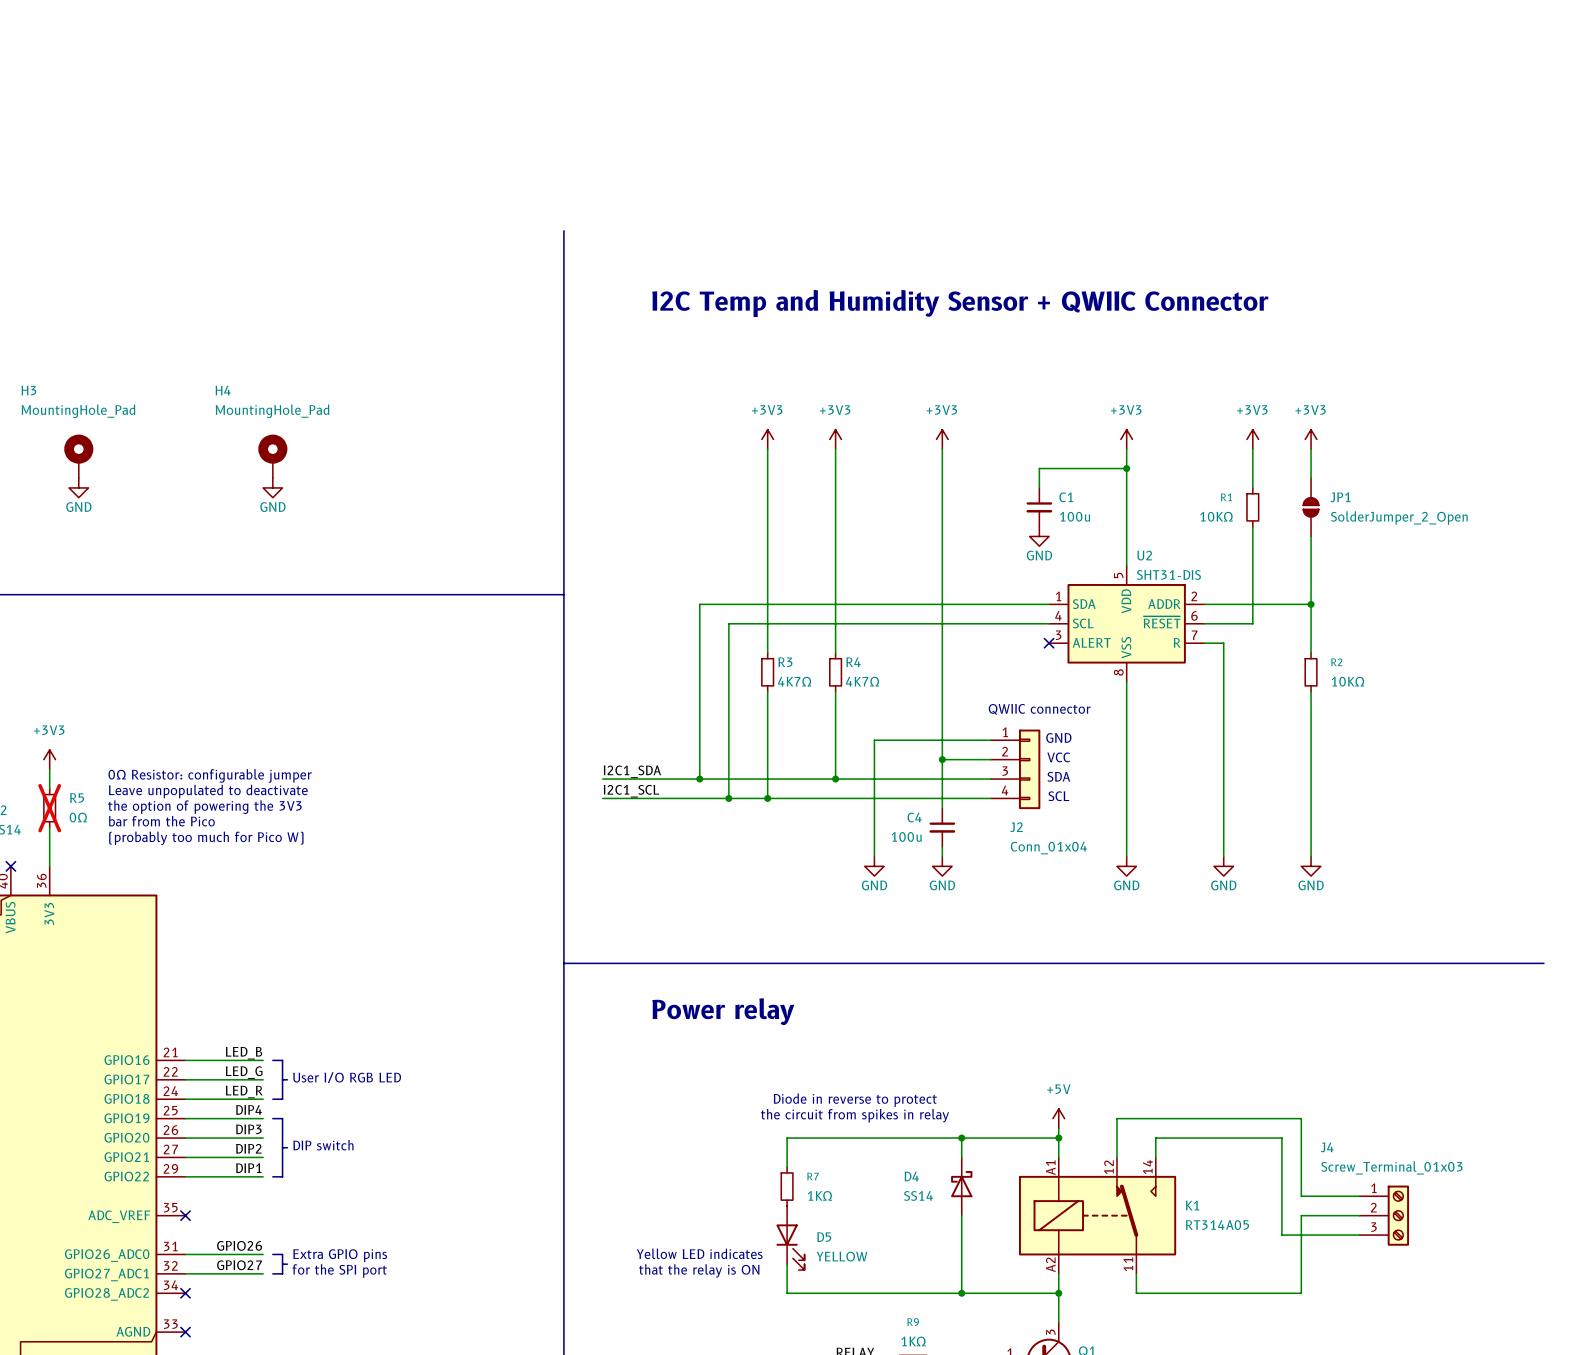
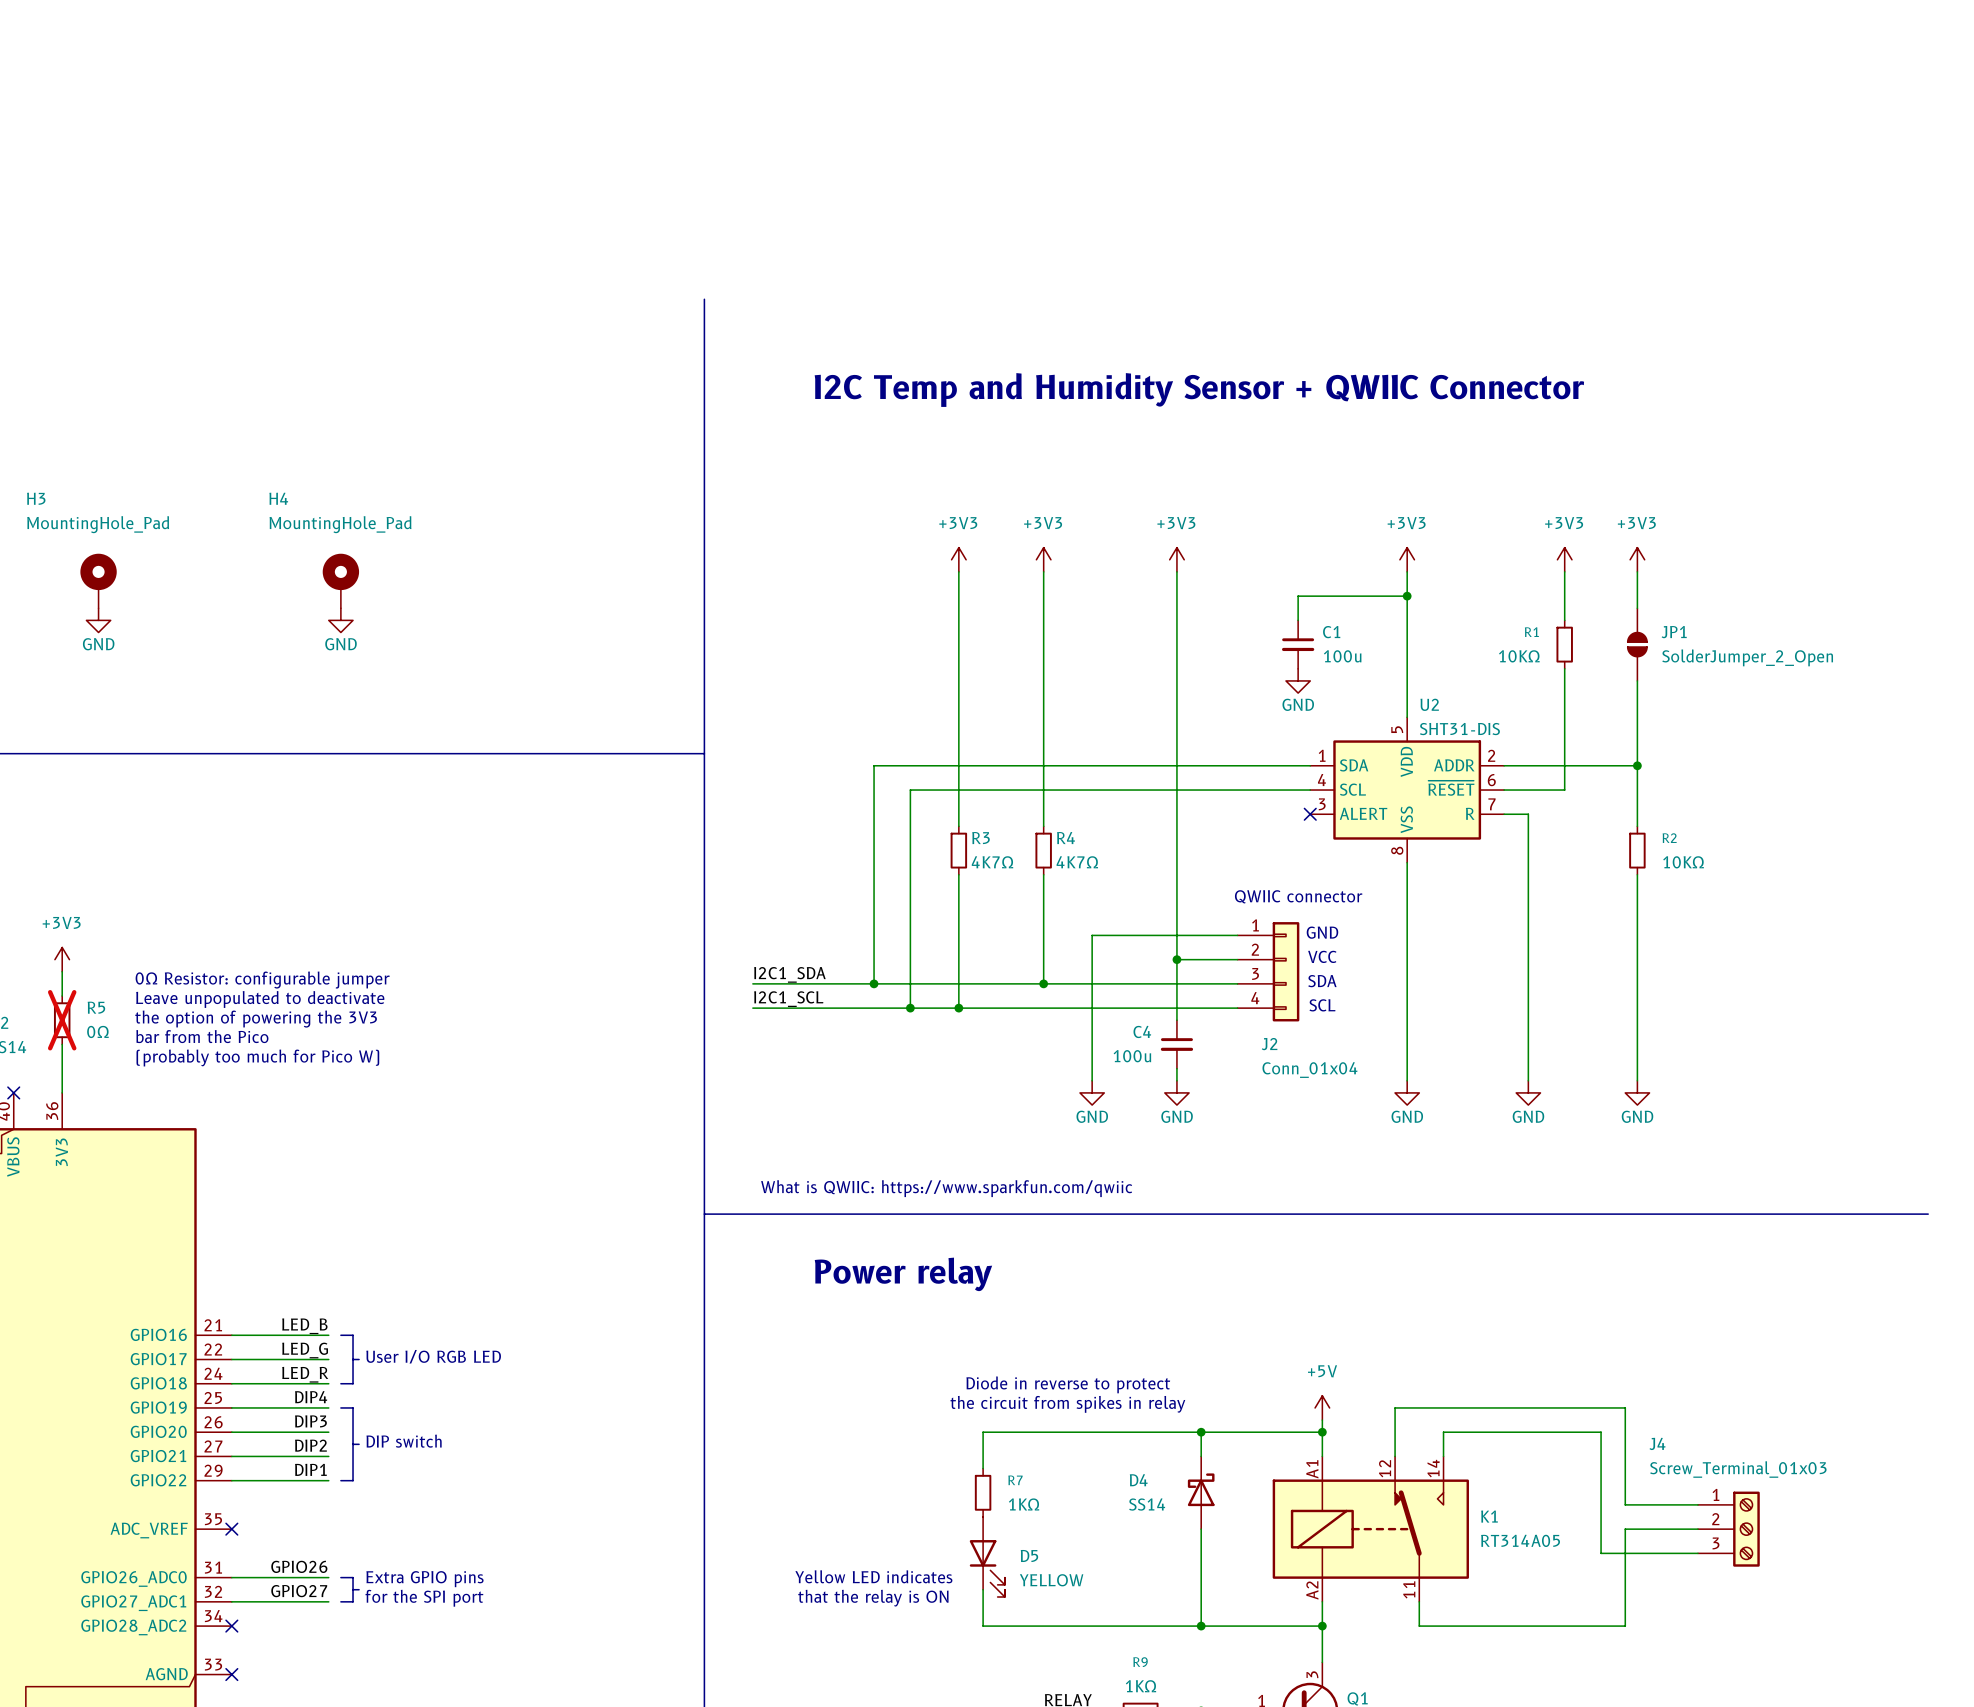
text: none -> What is QWIIC: https://www.sparkfun.com/qwiic (946, 1188)

